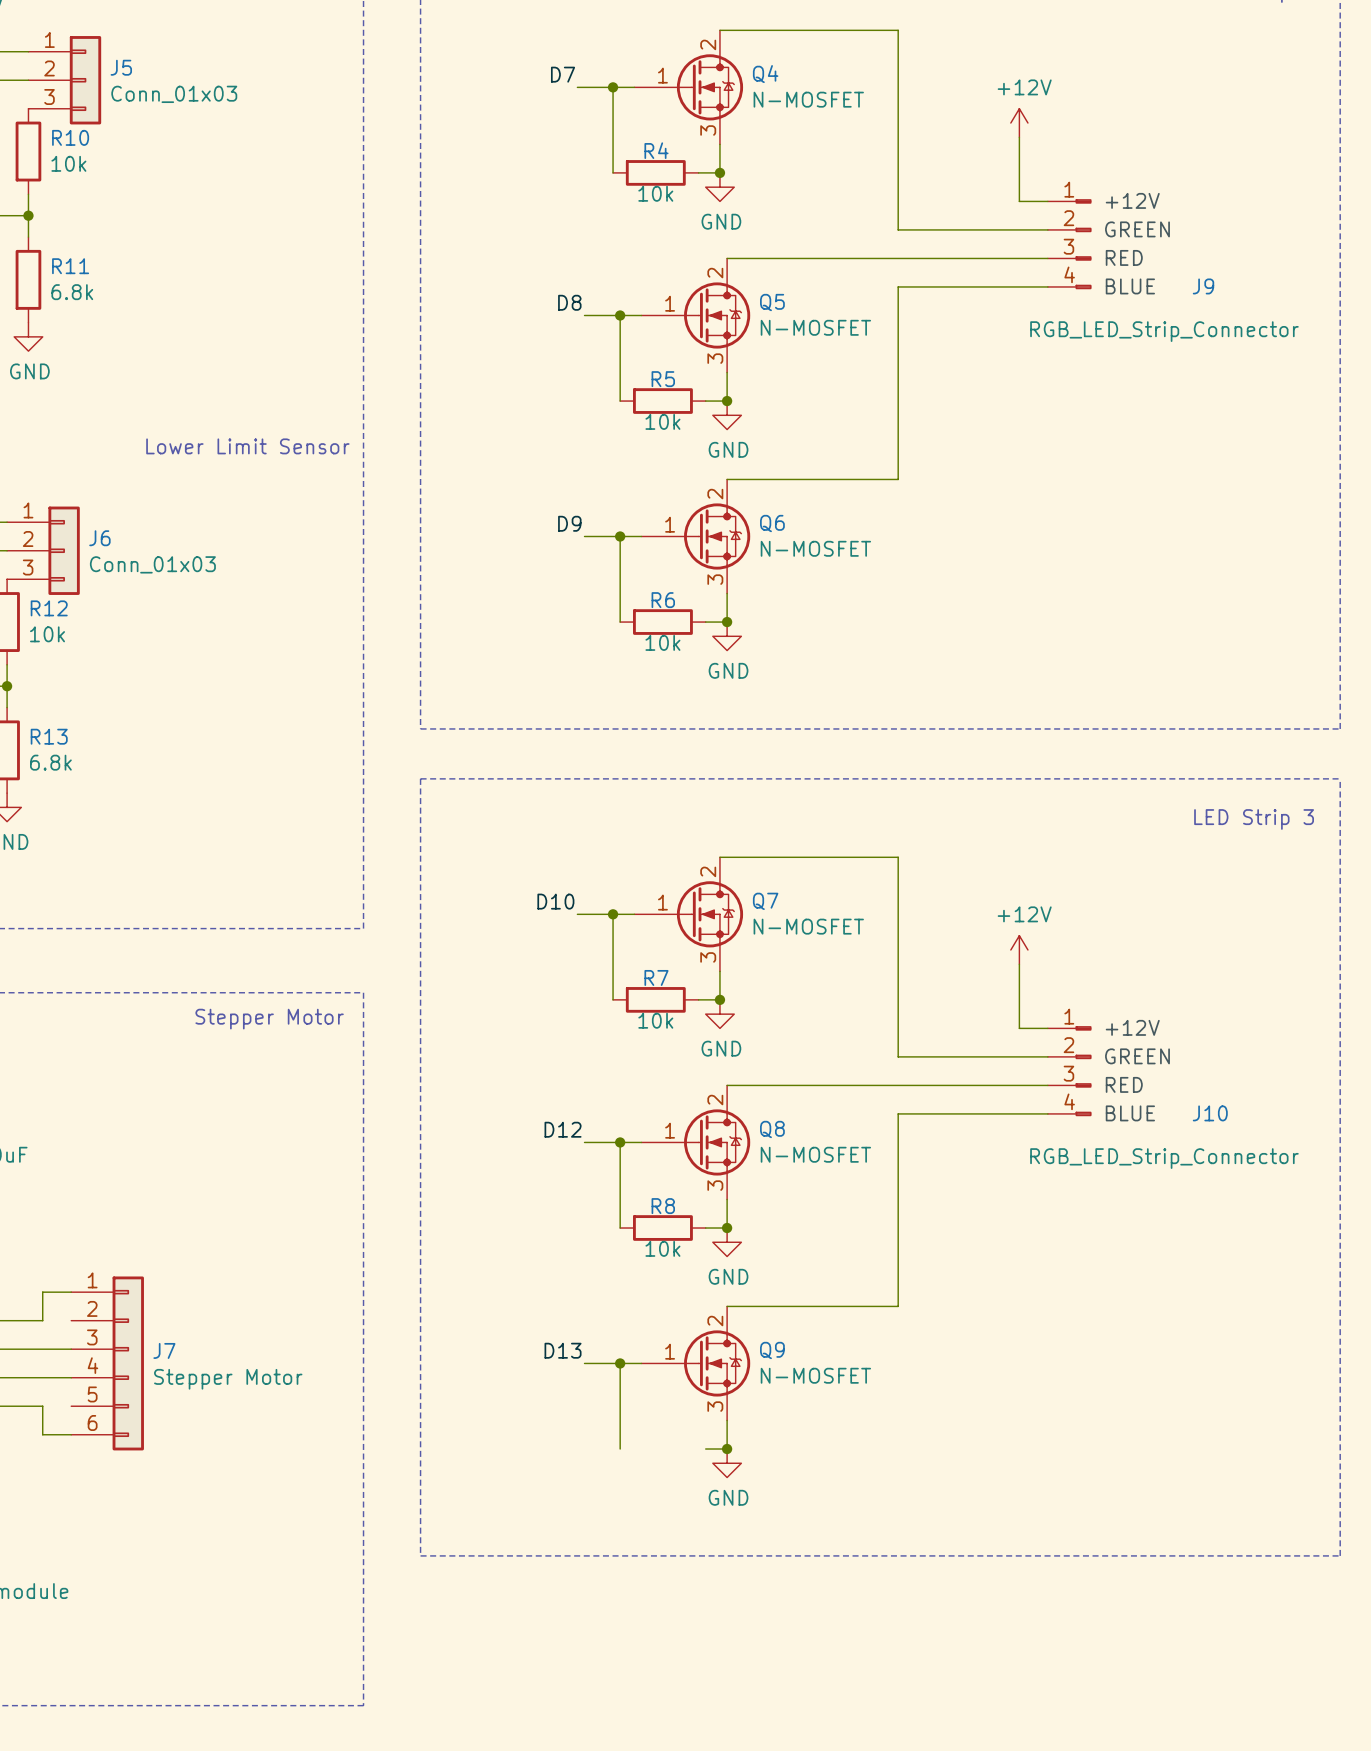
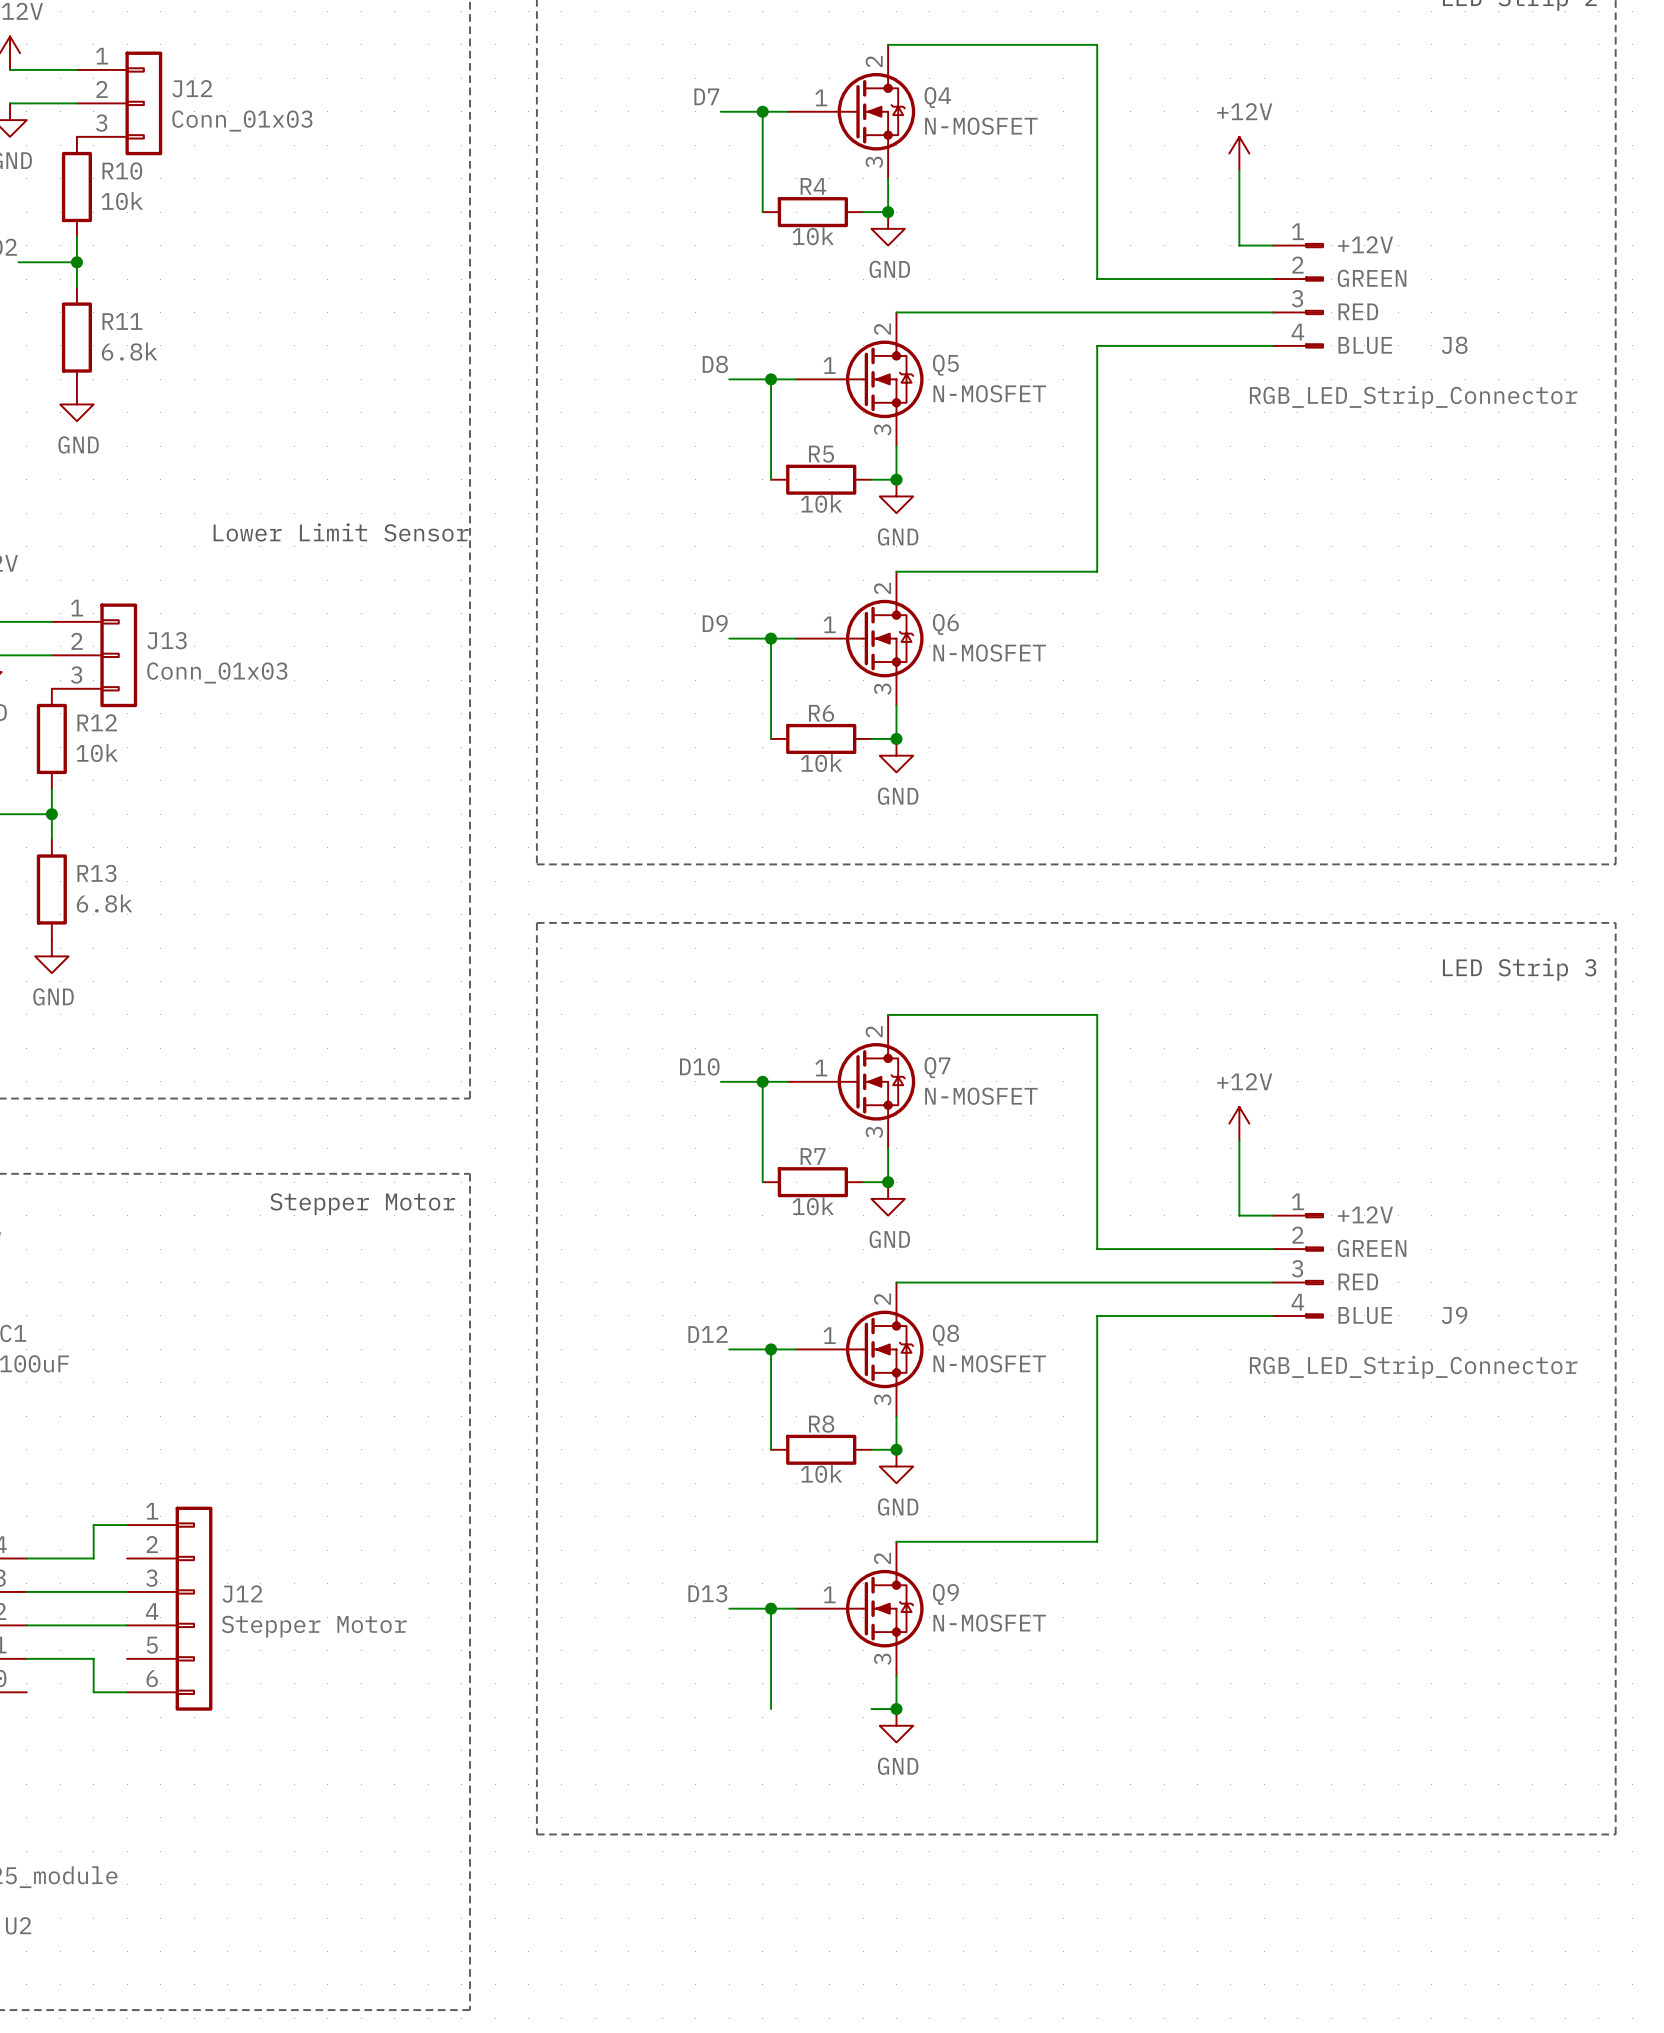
J5 name: J5 (121, 67) -> J12 (192, 88)
J9 name: J9 (1203, 286) -> J8 (1454, 345)
J6 name: J6 (99, 538) -> J13 (166, 640)
J10 name: J10 (1210, 1113) -> J9 (1454, 1315)
J7 name: J7 (164, 1350) -> J12 (242, 1594)

